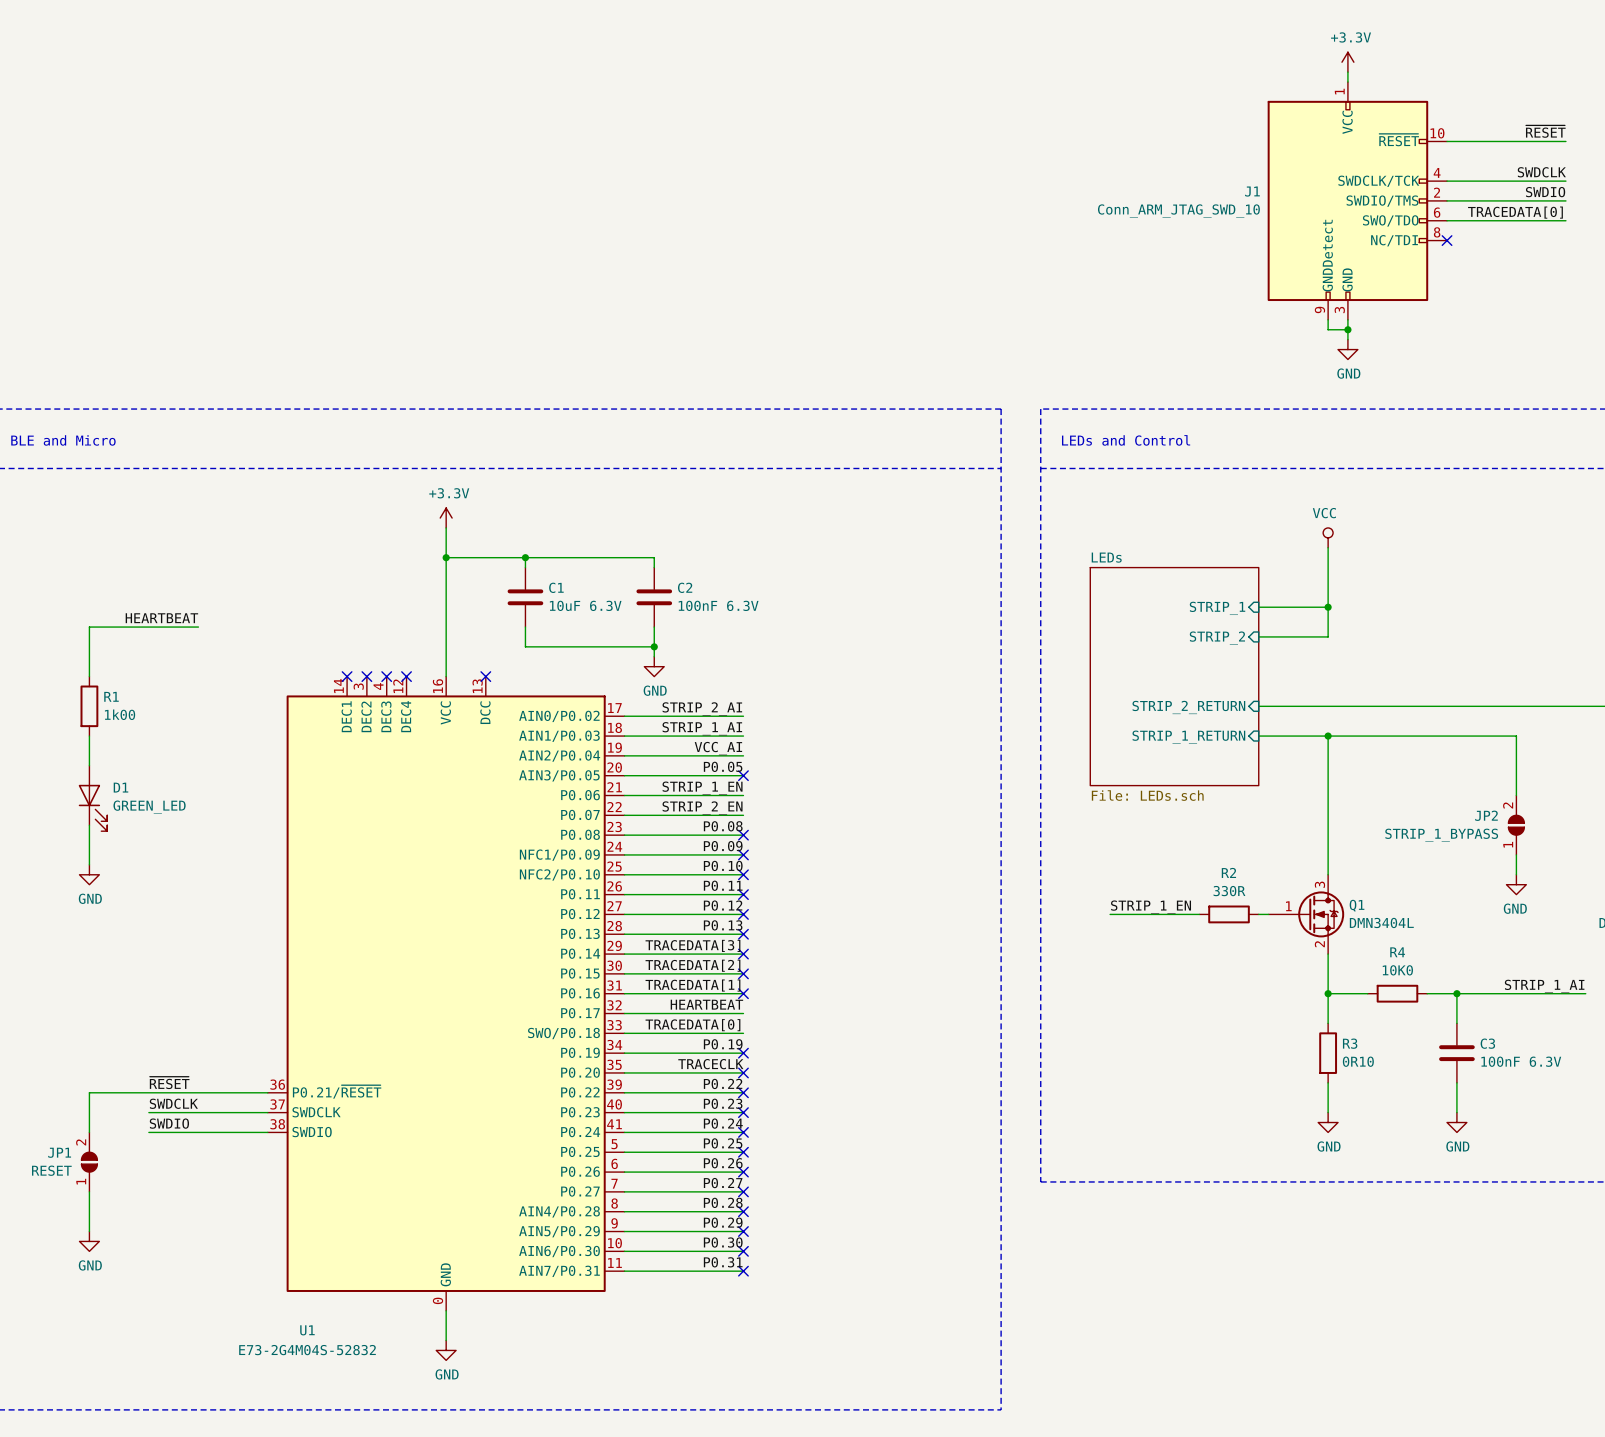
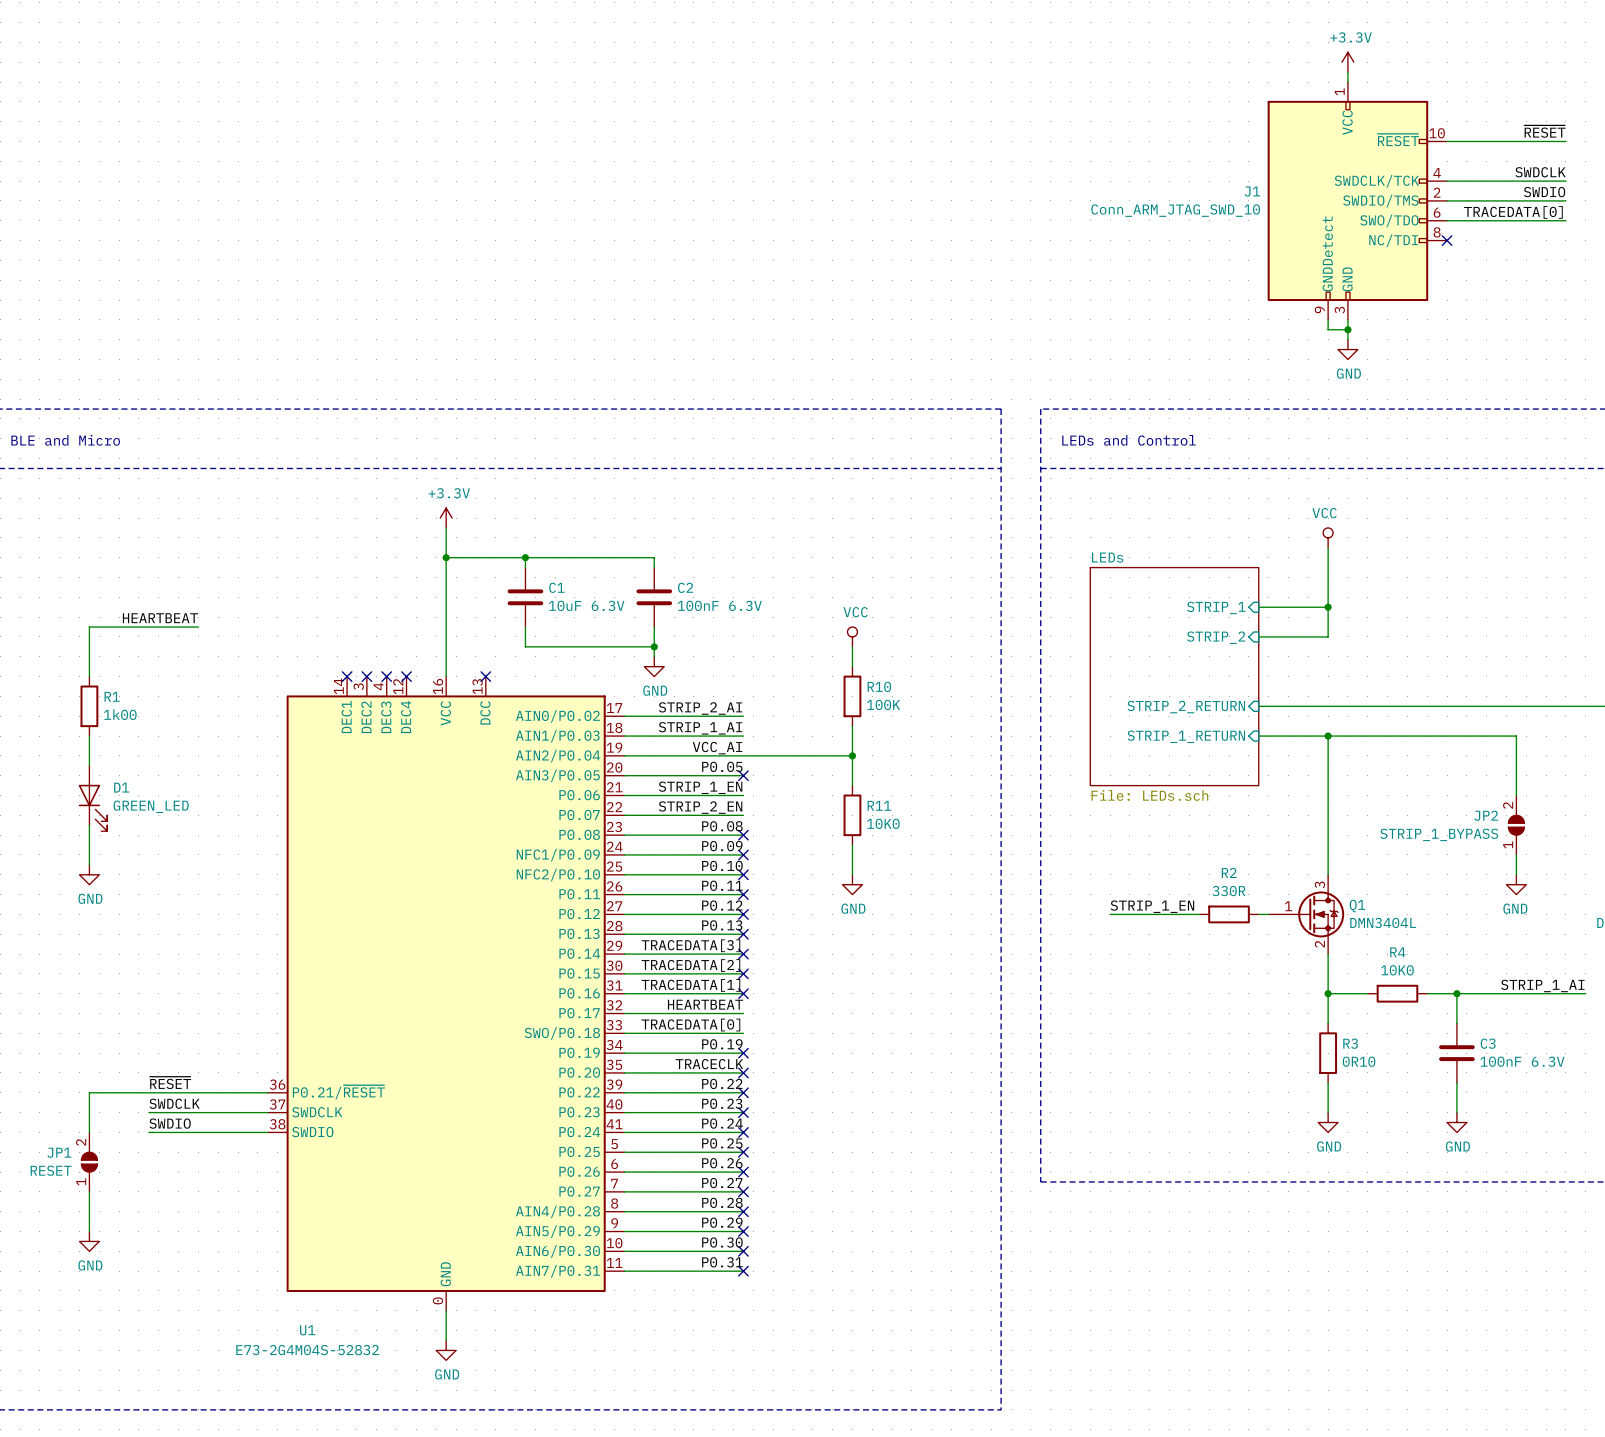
power symbol: none -> VCC (852, 636)
wire: none -> (852, 646) (852, 666)
R10: none -> 100K (852, 696)
wire: none -> (852, 726) (852, 785)
wire: none -> (743, 755) (852, 755)
junction: none -> (852, 755)
R11: none -> 10K0 (852, 815)
wire: none -> (852, 845) (852, 874)
power symbol: none -> GND (852, 884)

